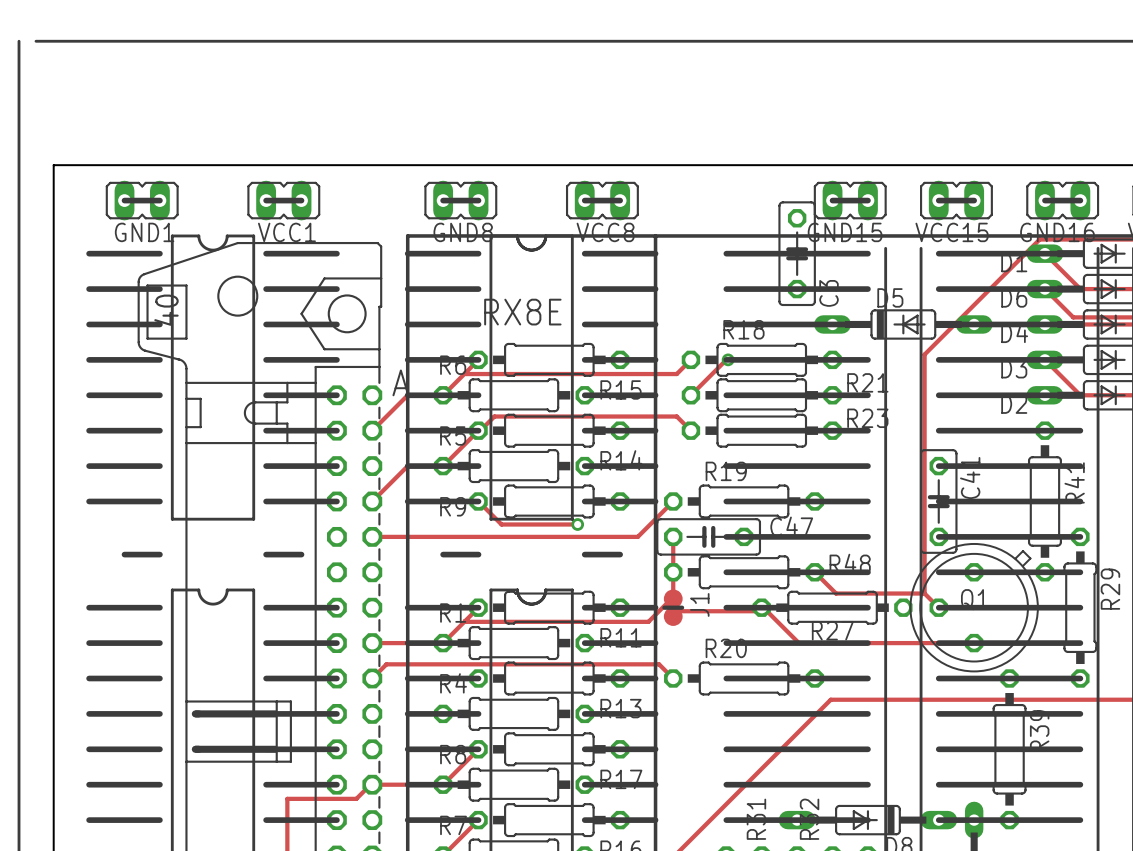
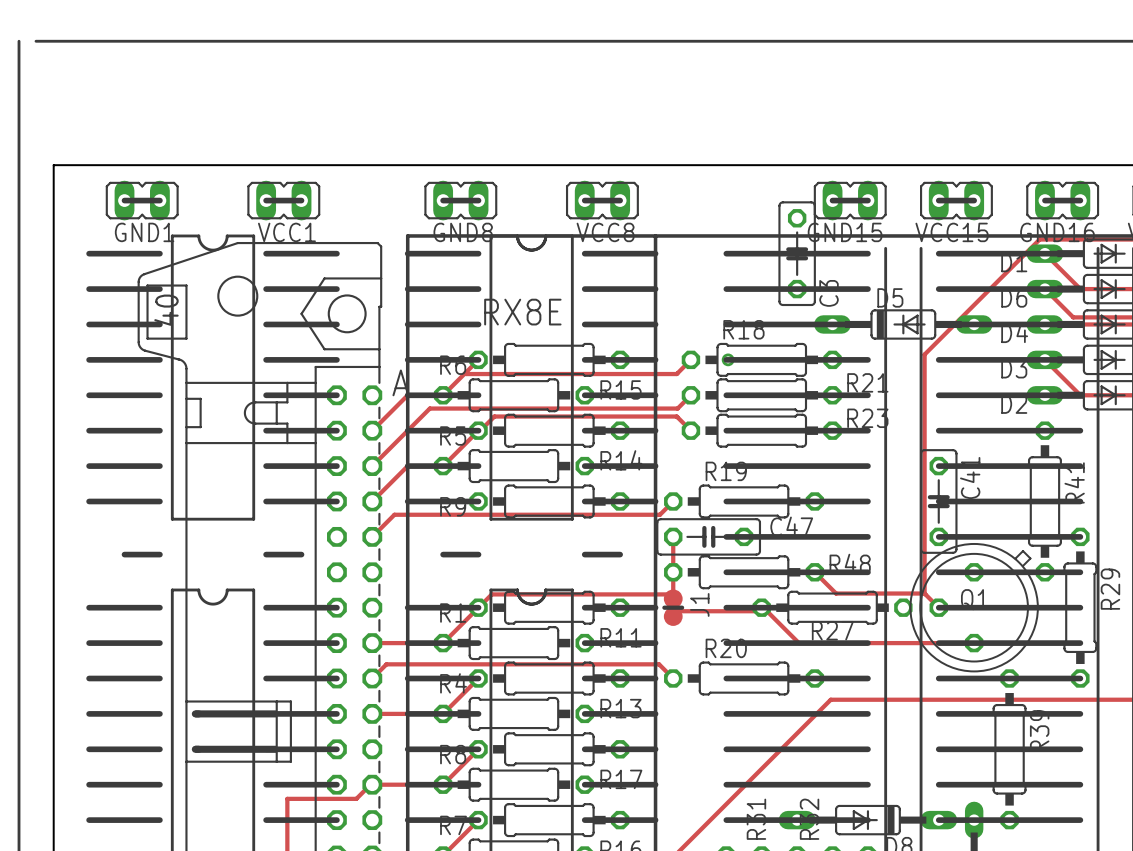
track: (728, 359) (690, 395) -> (372, 466) (429, 408) (677, 408) (690, 395)
track: (478, 501) (501, 524) (577, 524) -> none
track: (659, 514) (637, 536) (372, 536) -> (659, 514) (394, 514) (372, 536)
via: (577, 524) -> none
track: none -> (673, 594) (491, 594) (478, 607)
track: (673, 598) (648, 621) (465, 620) -> none
track: none -> (478, 678) (443, 713) (372, 713)

